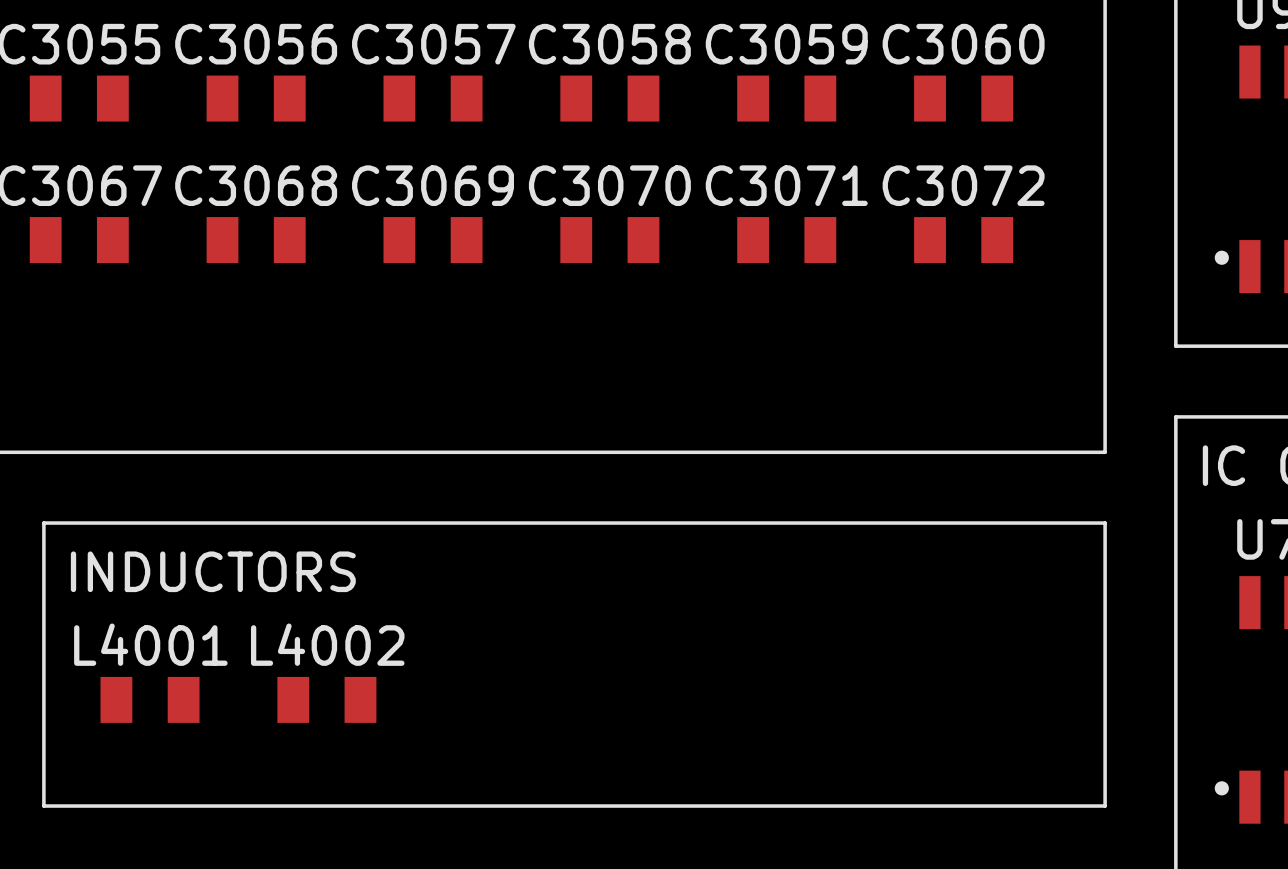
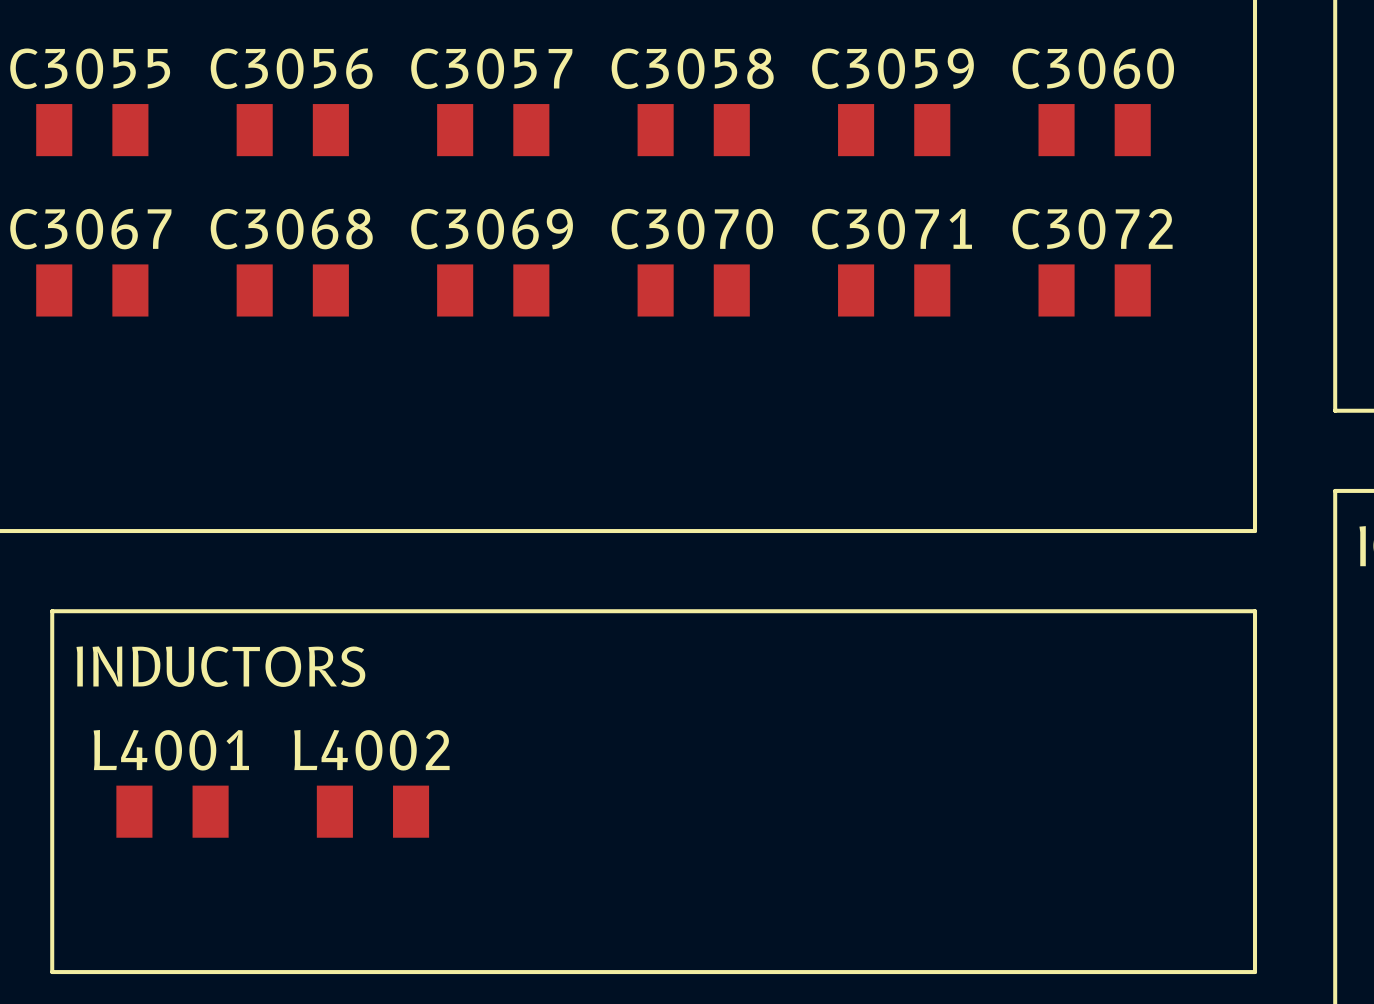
line: (43, 806) (1105, 806) -> (52, 931) (52, 972) (1255, 972) (1255, 931)

